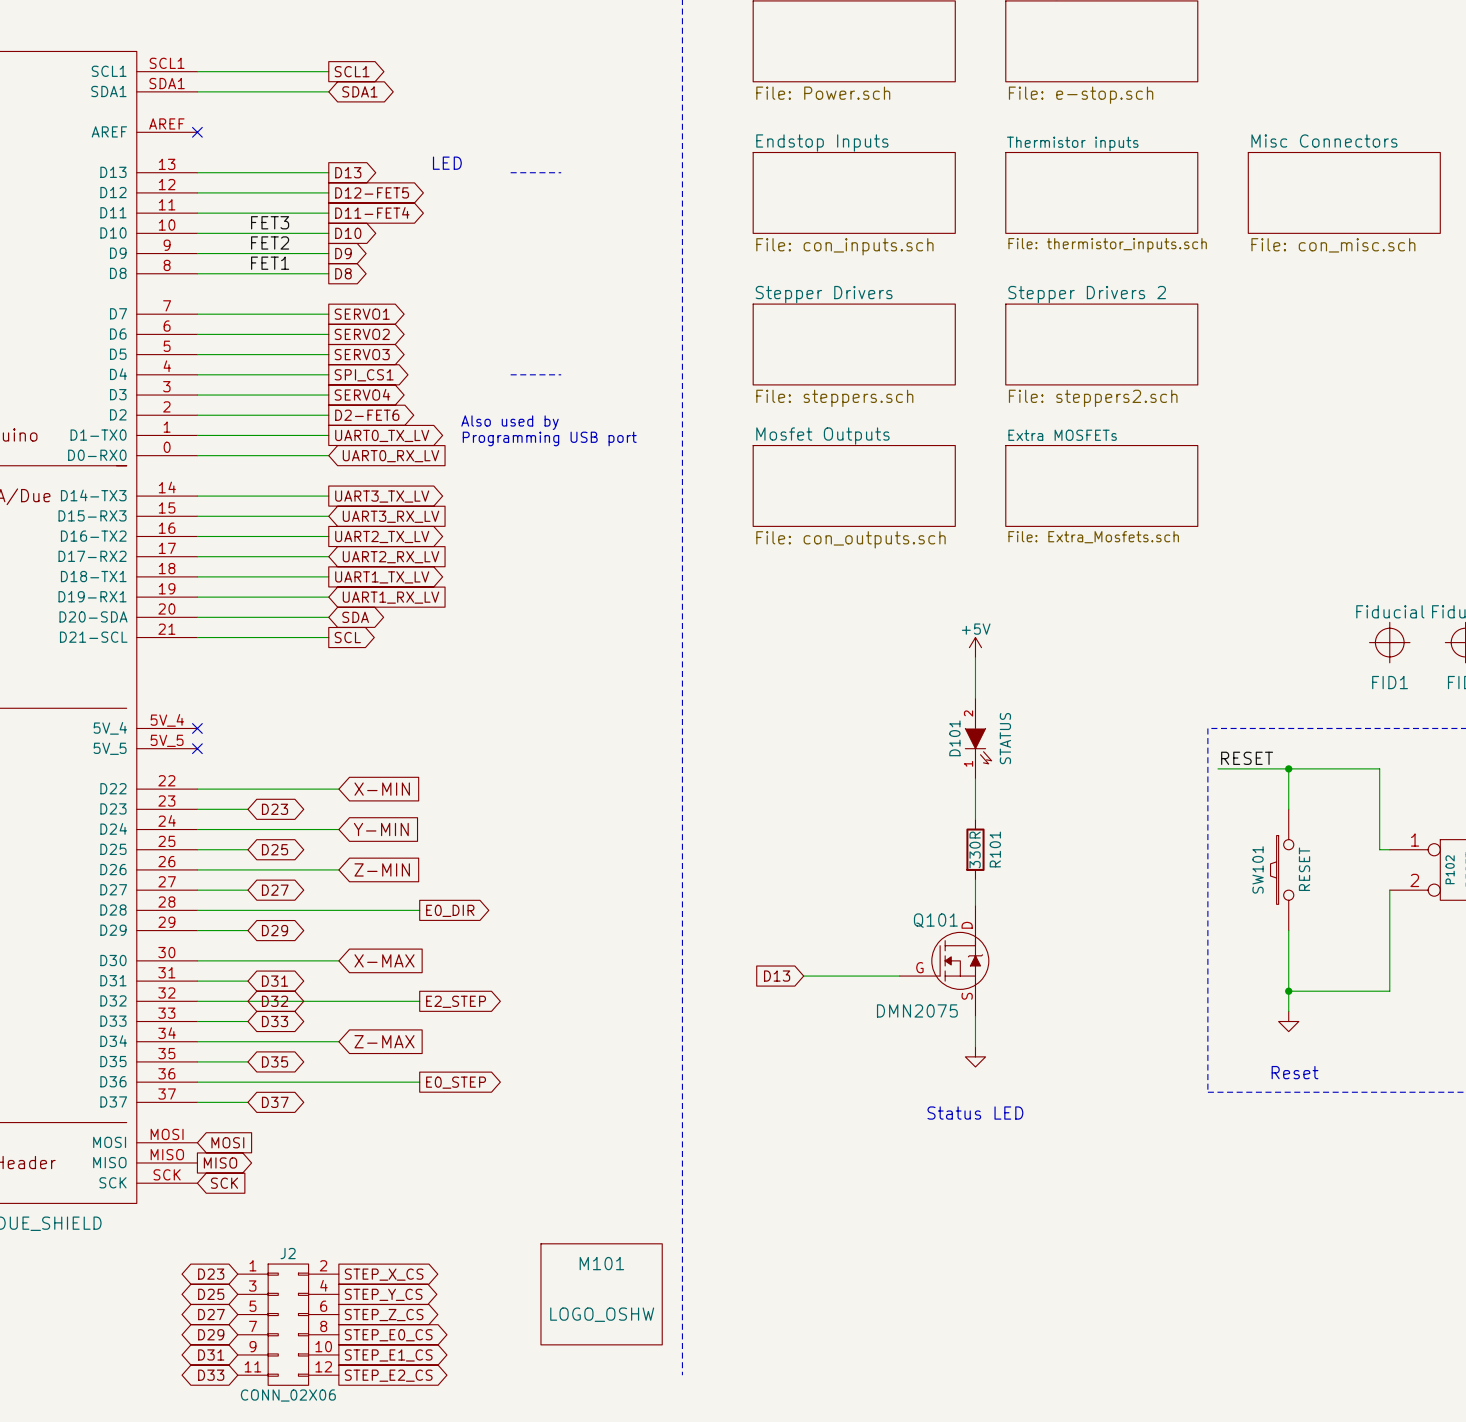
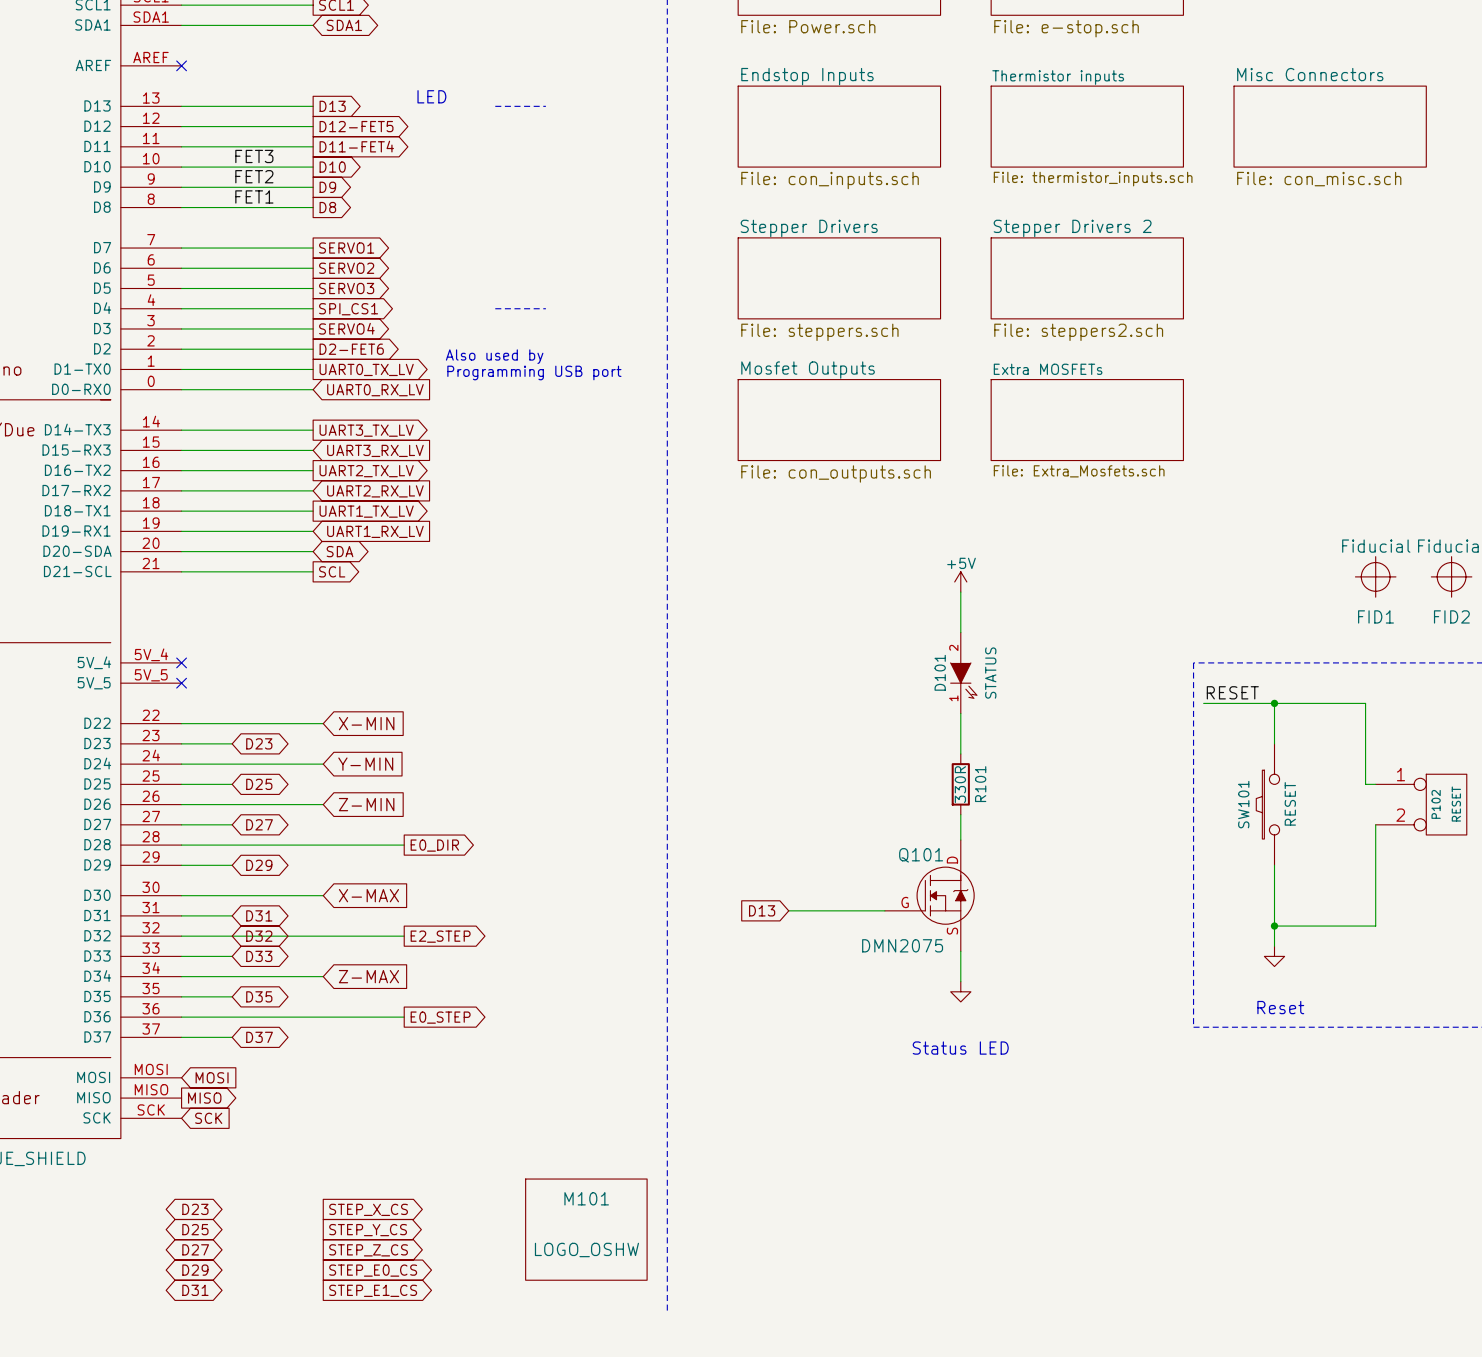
J2: CONN_02X06 (288, 1324) -> none
global label: D33 (211, 1375) -> none
global label: STEP_E2_CS (388, 1375) -> none

